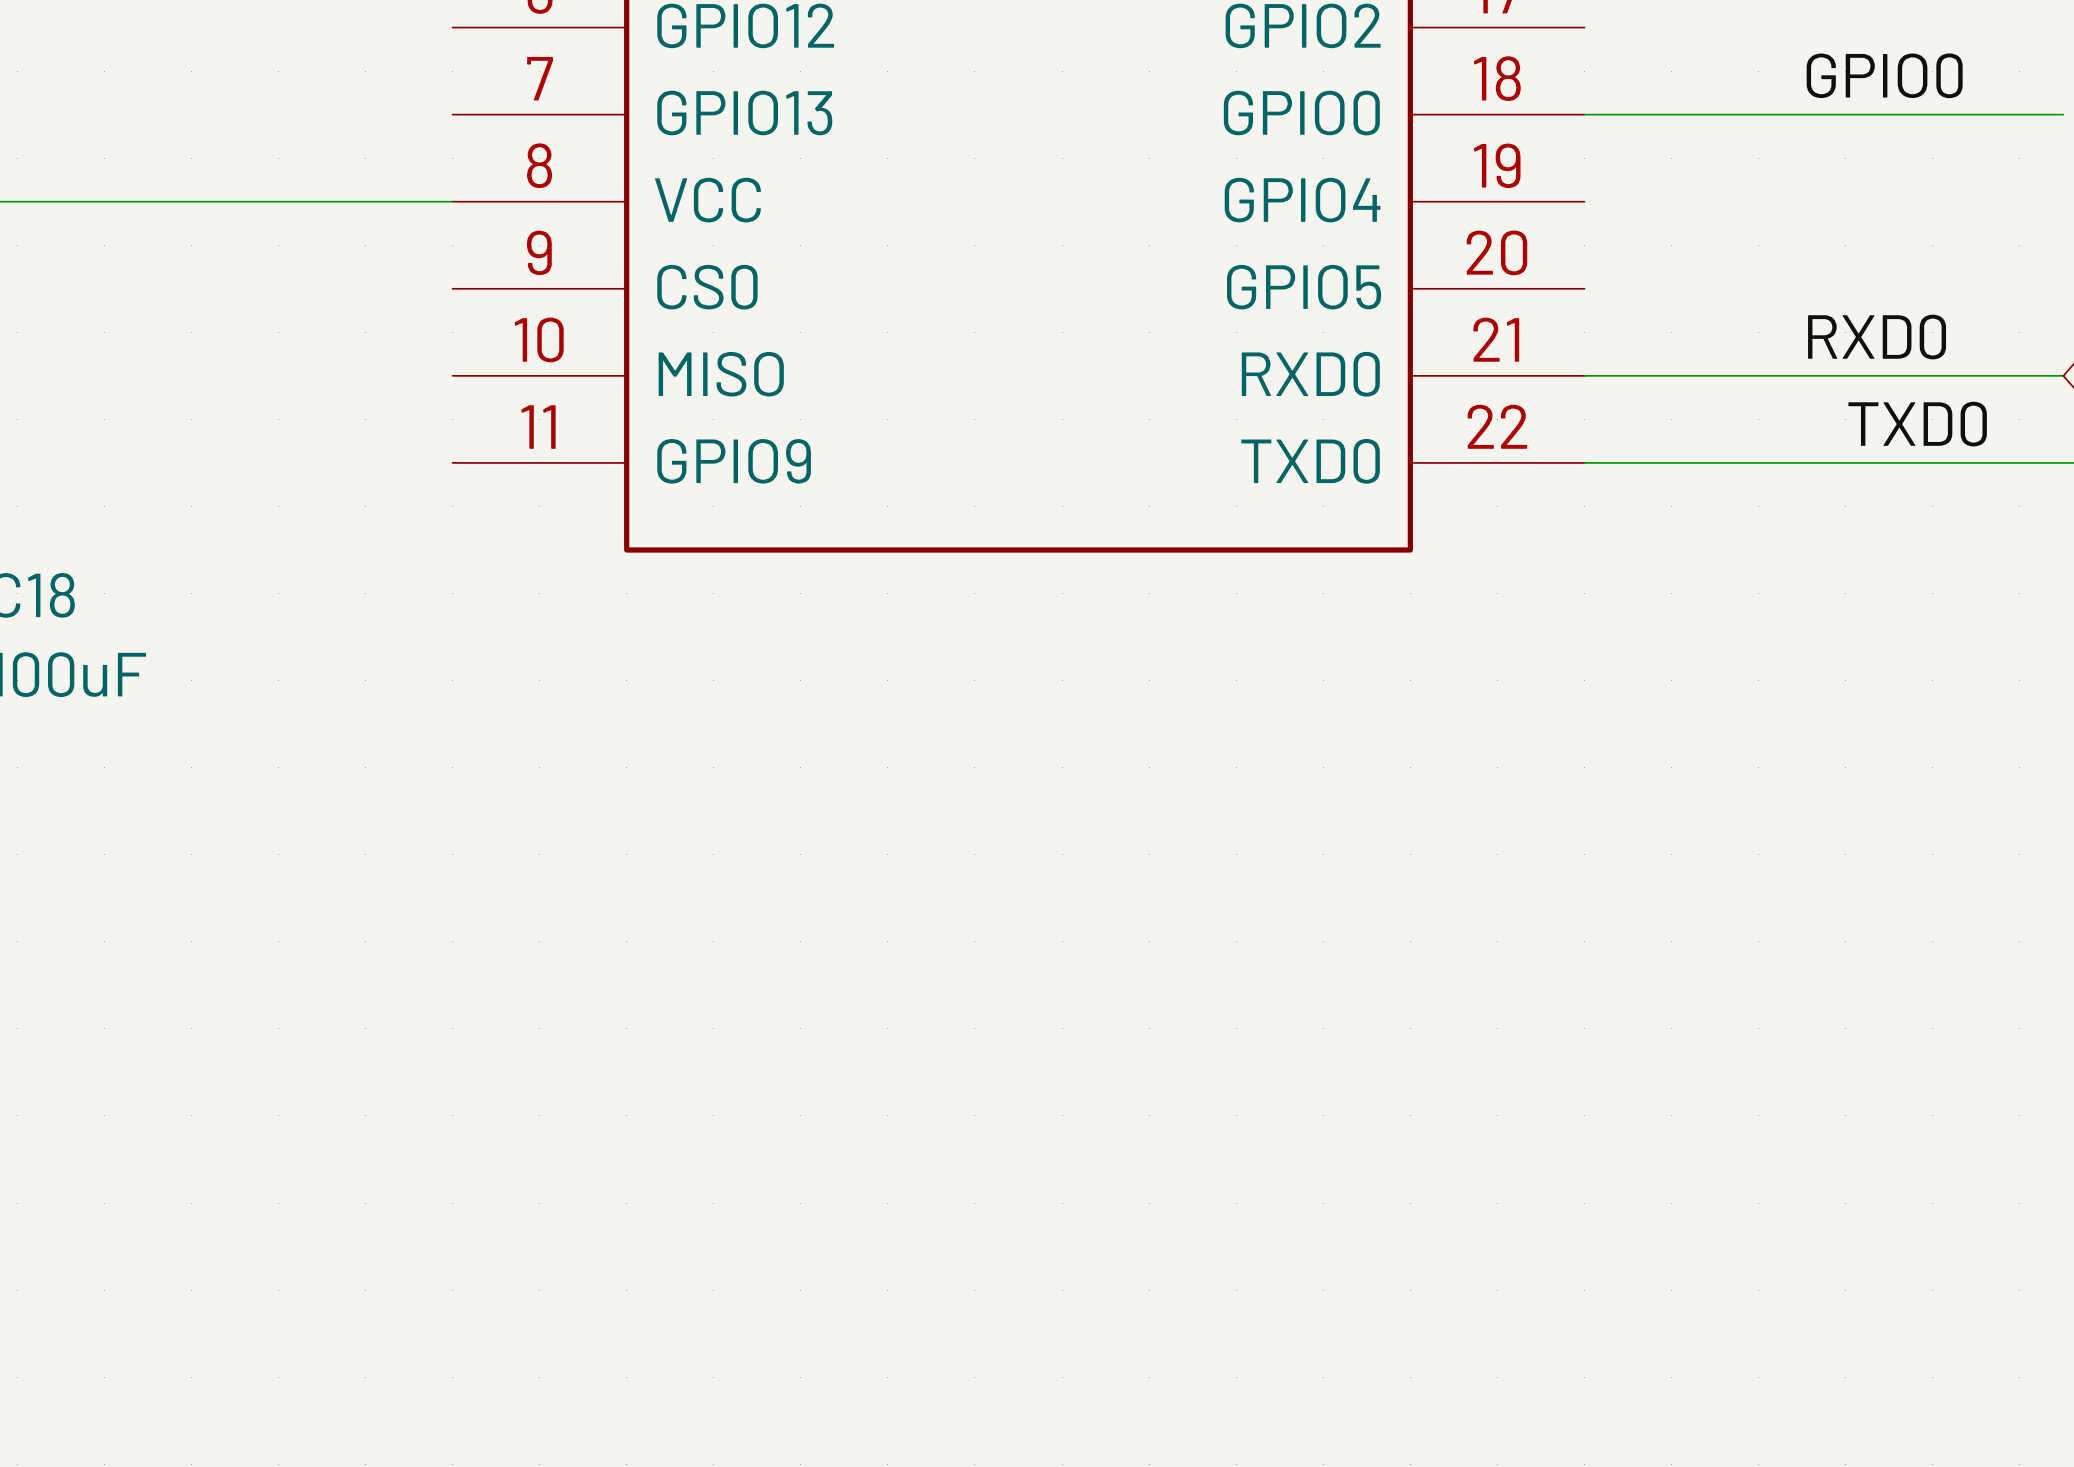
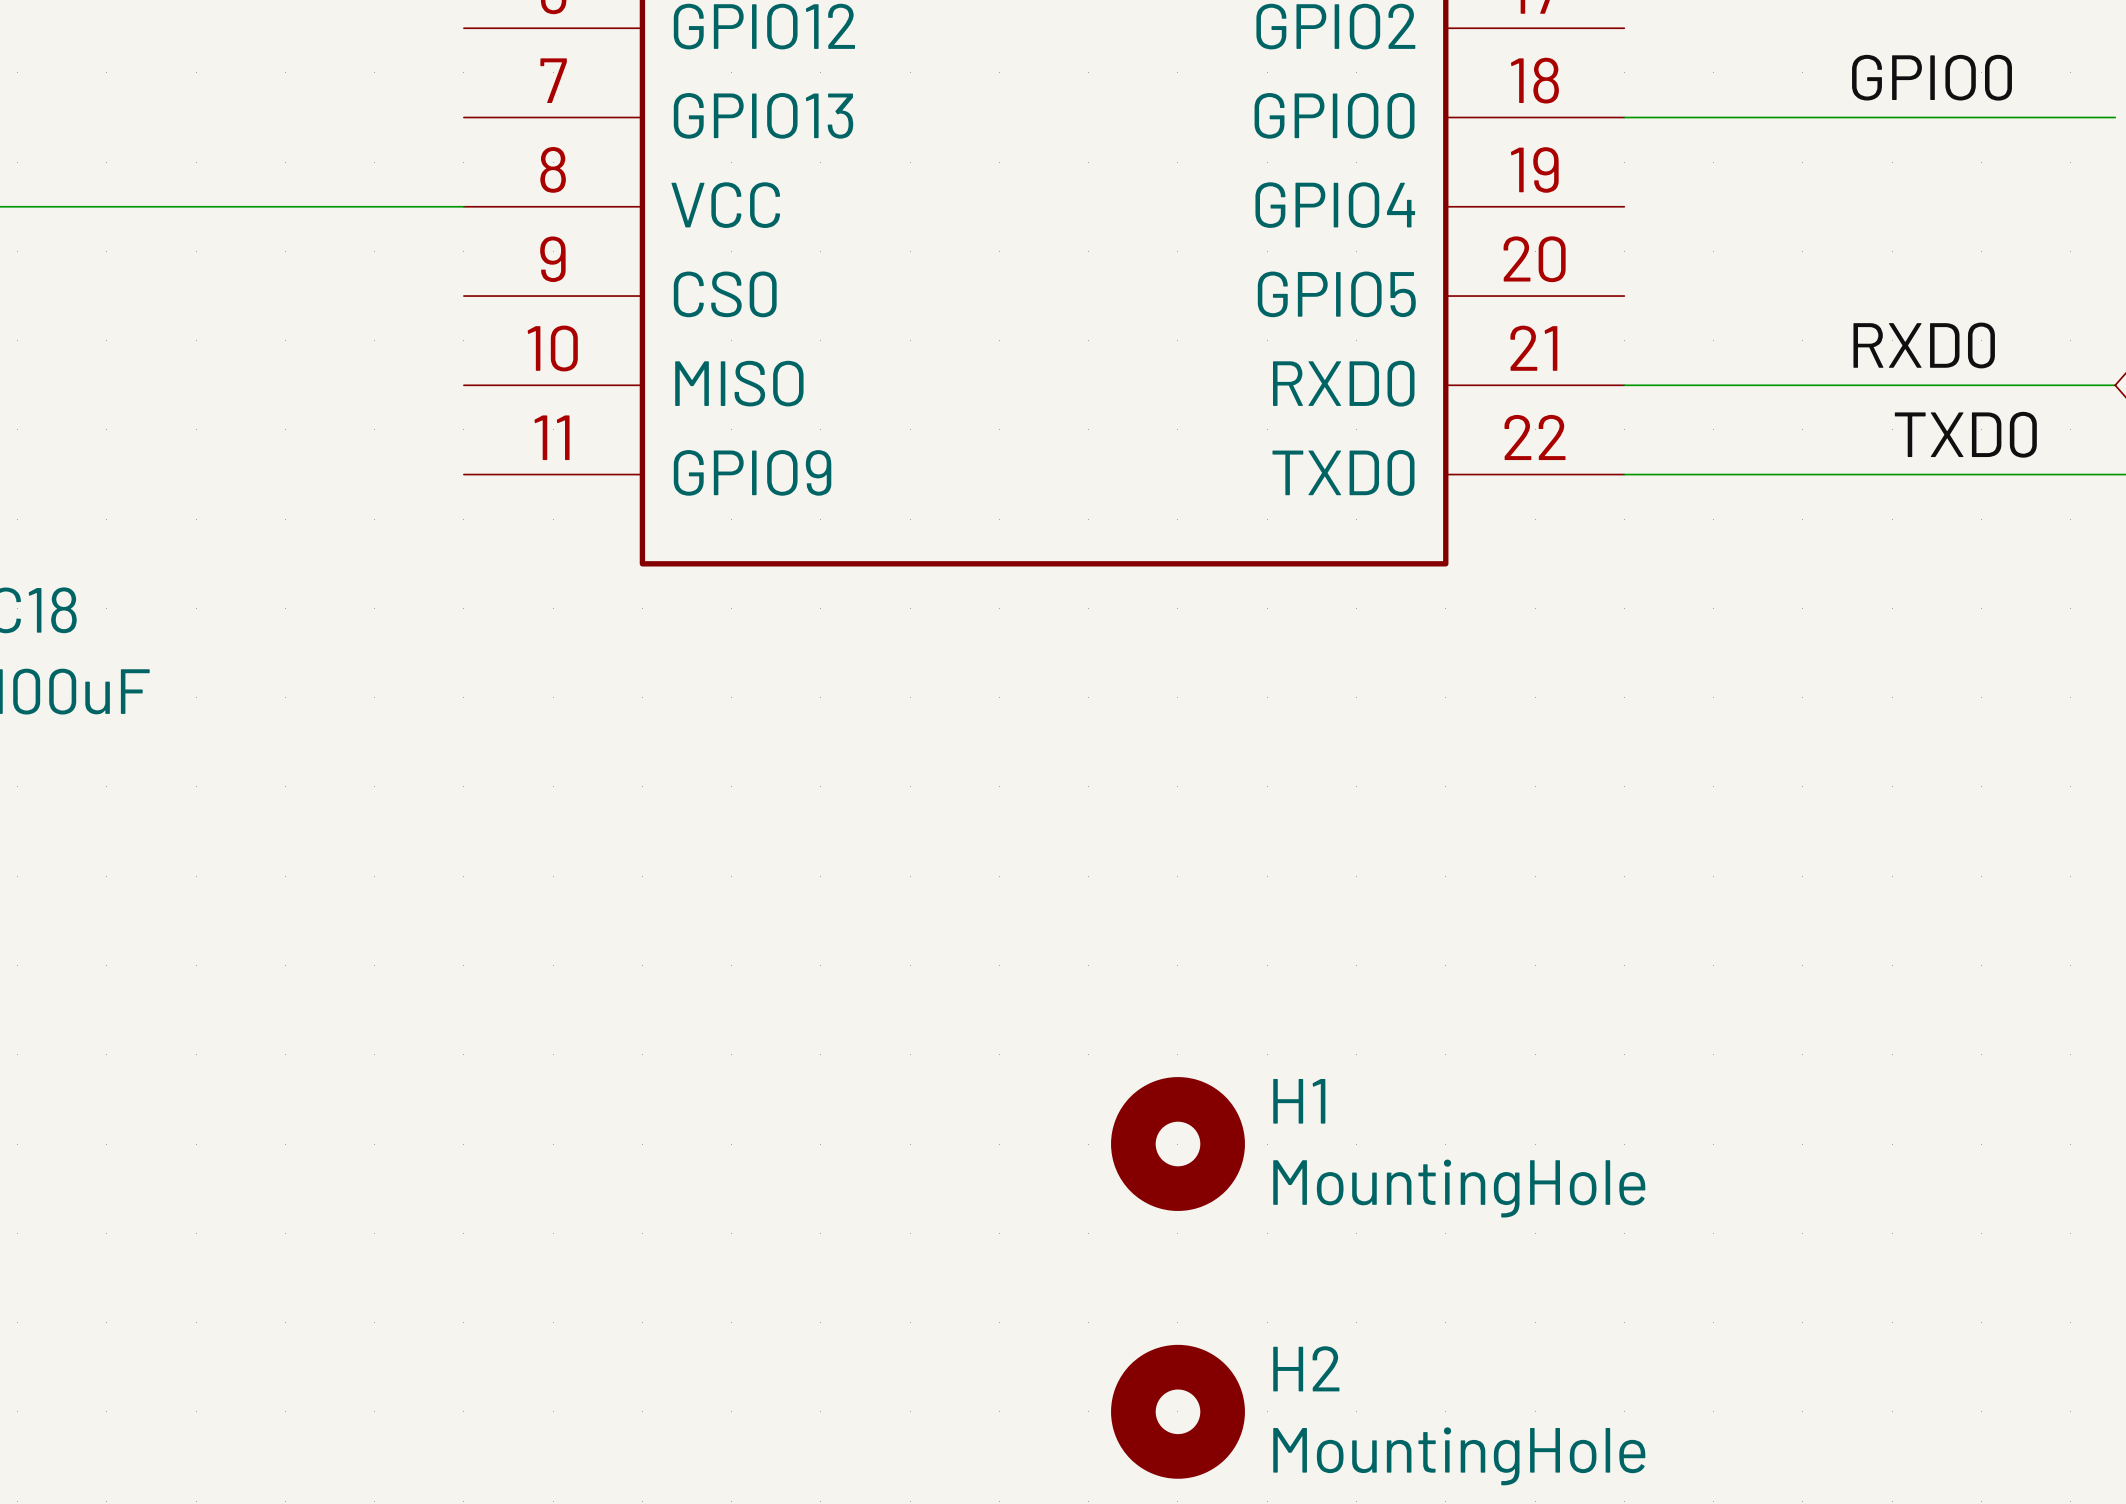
H1: none -> MountingHole (1177, 1144)
H2: none -> MountingHole (1177, 1411)

